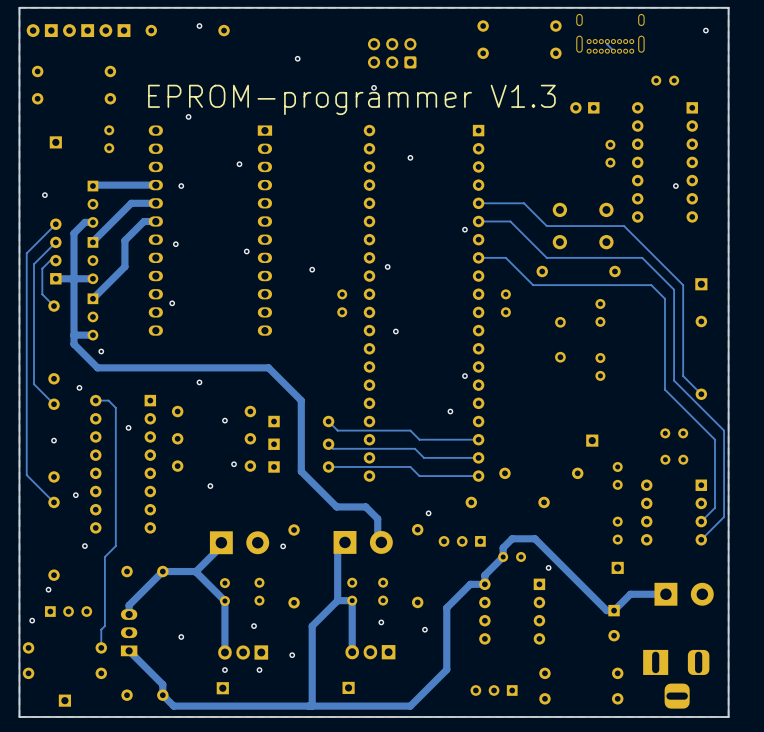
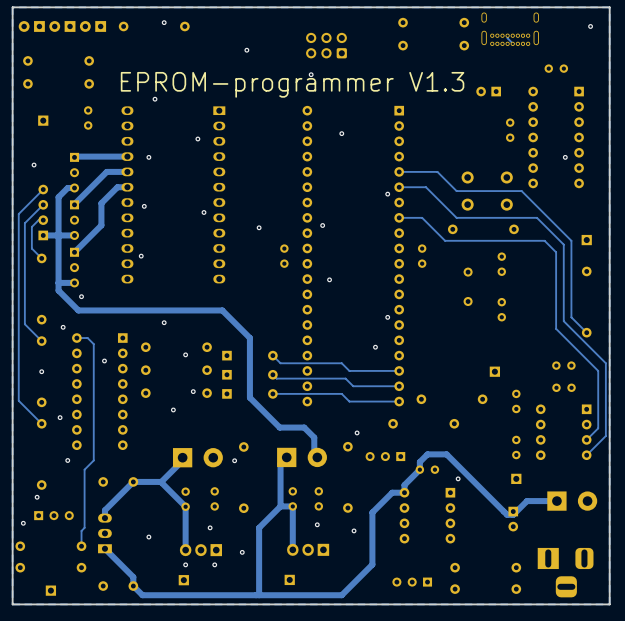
part: none -> (513, 519)
part: (614, 623) -> none

